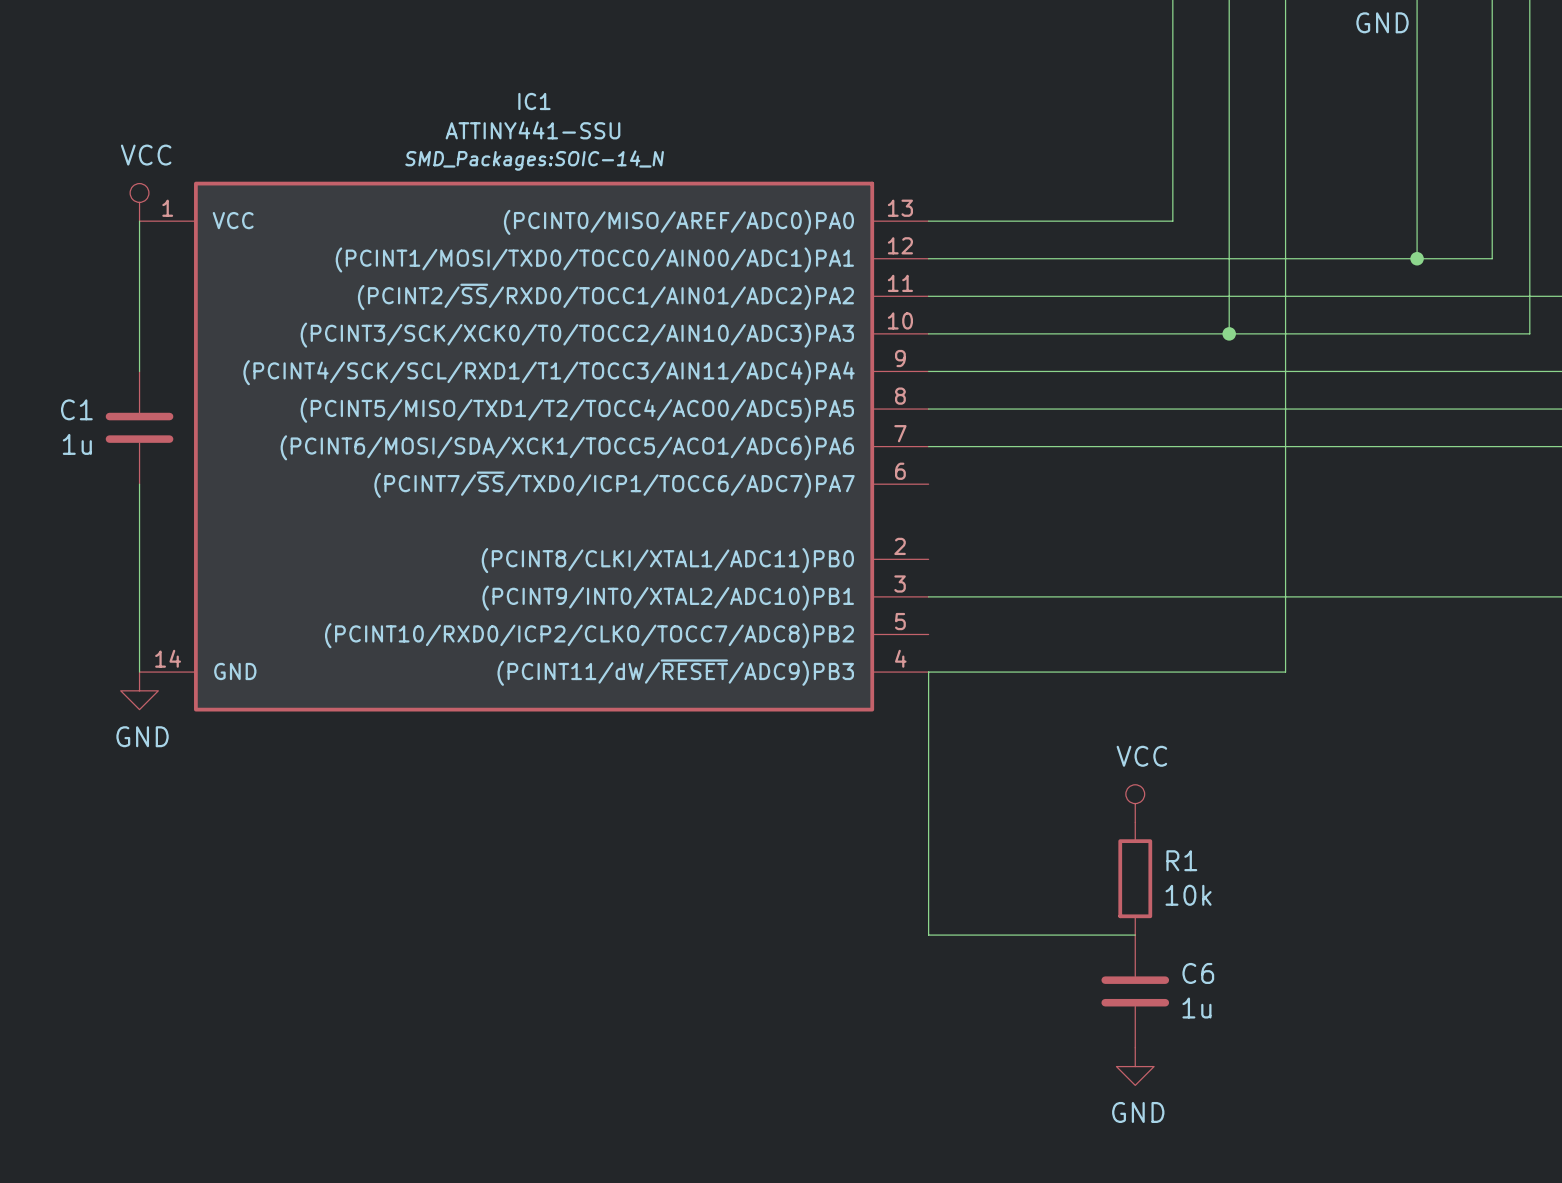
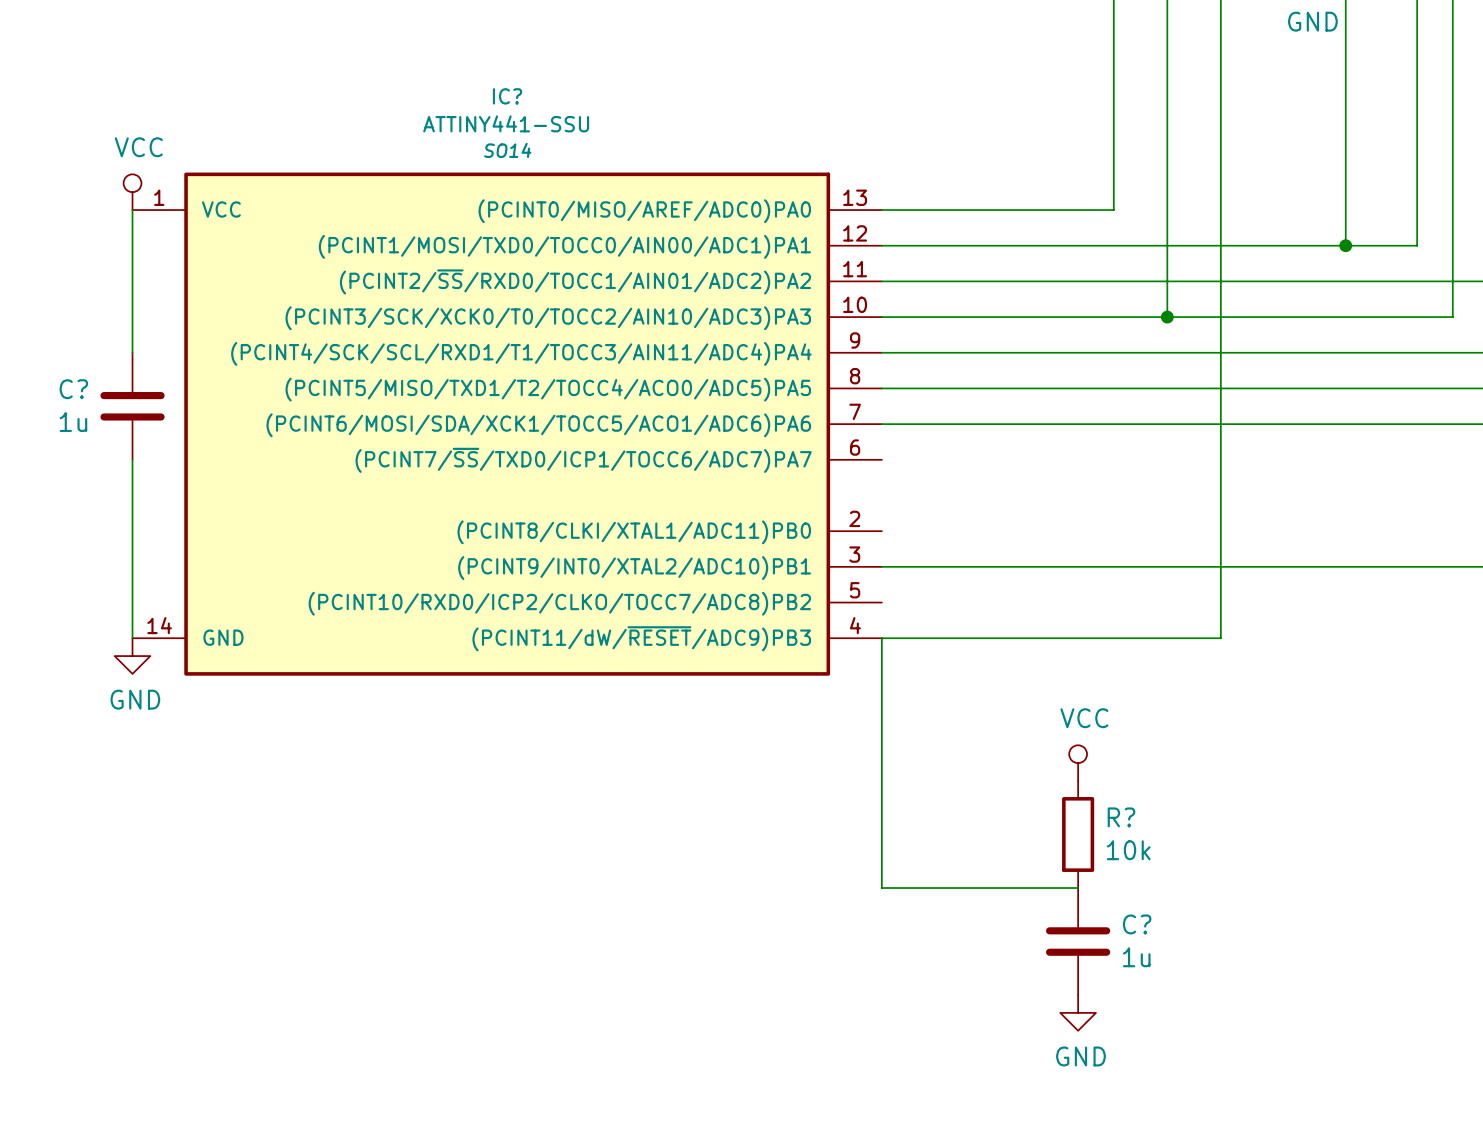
IC1 name: IC1 (534, 101) -> IC? (507, 96)
IC1 text: SMD_Packages:SOIC-14_N (534, 160) -> SO14 (507, 150)
C1 name: C1 (76, 409) -> C? (73, 389)
R1 name: R1 (1181, 860) -> R? (1121, 817)
C6 name: C6 (1198, 973) -> C? (1137, 924)

